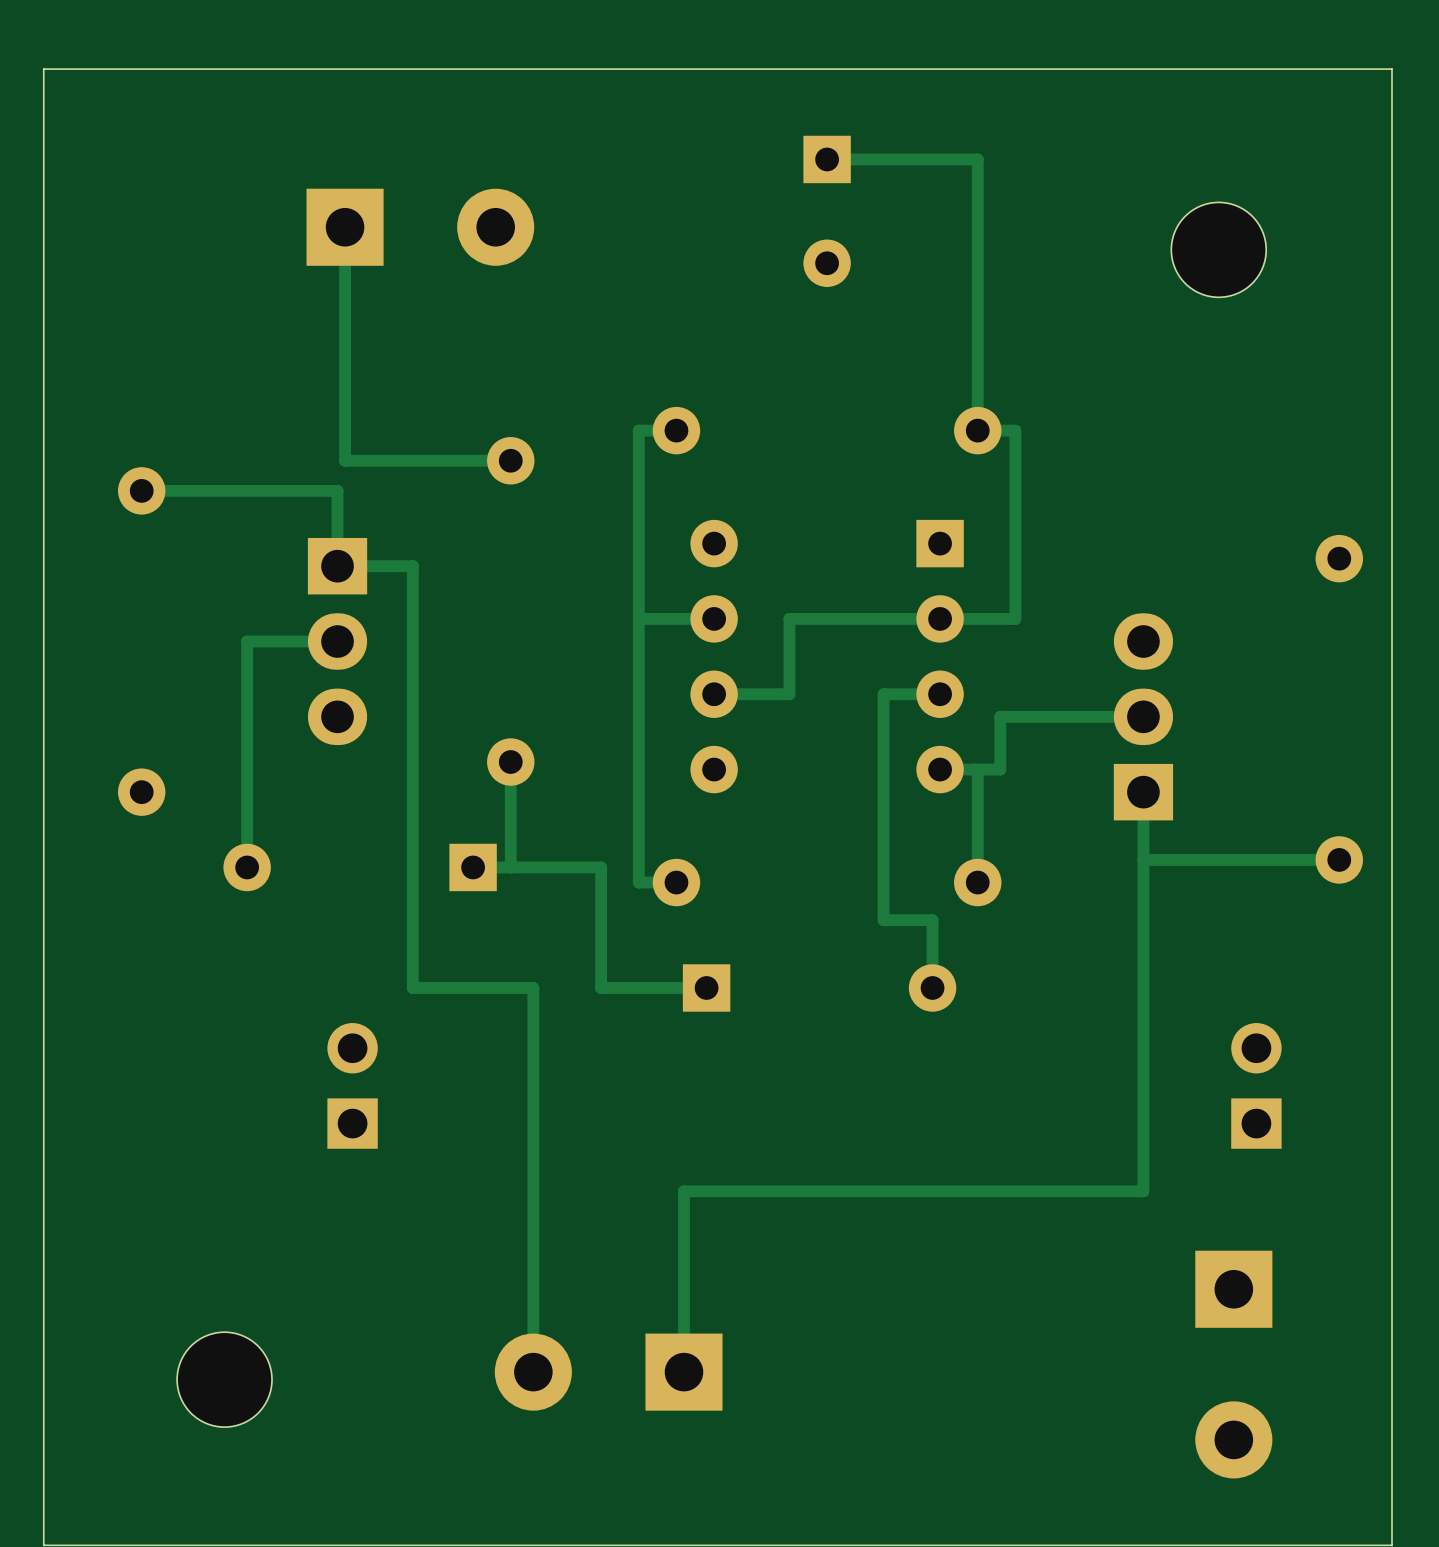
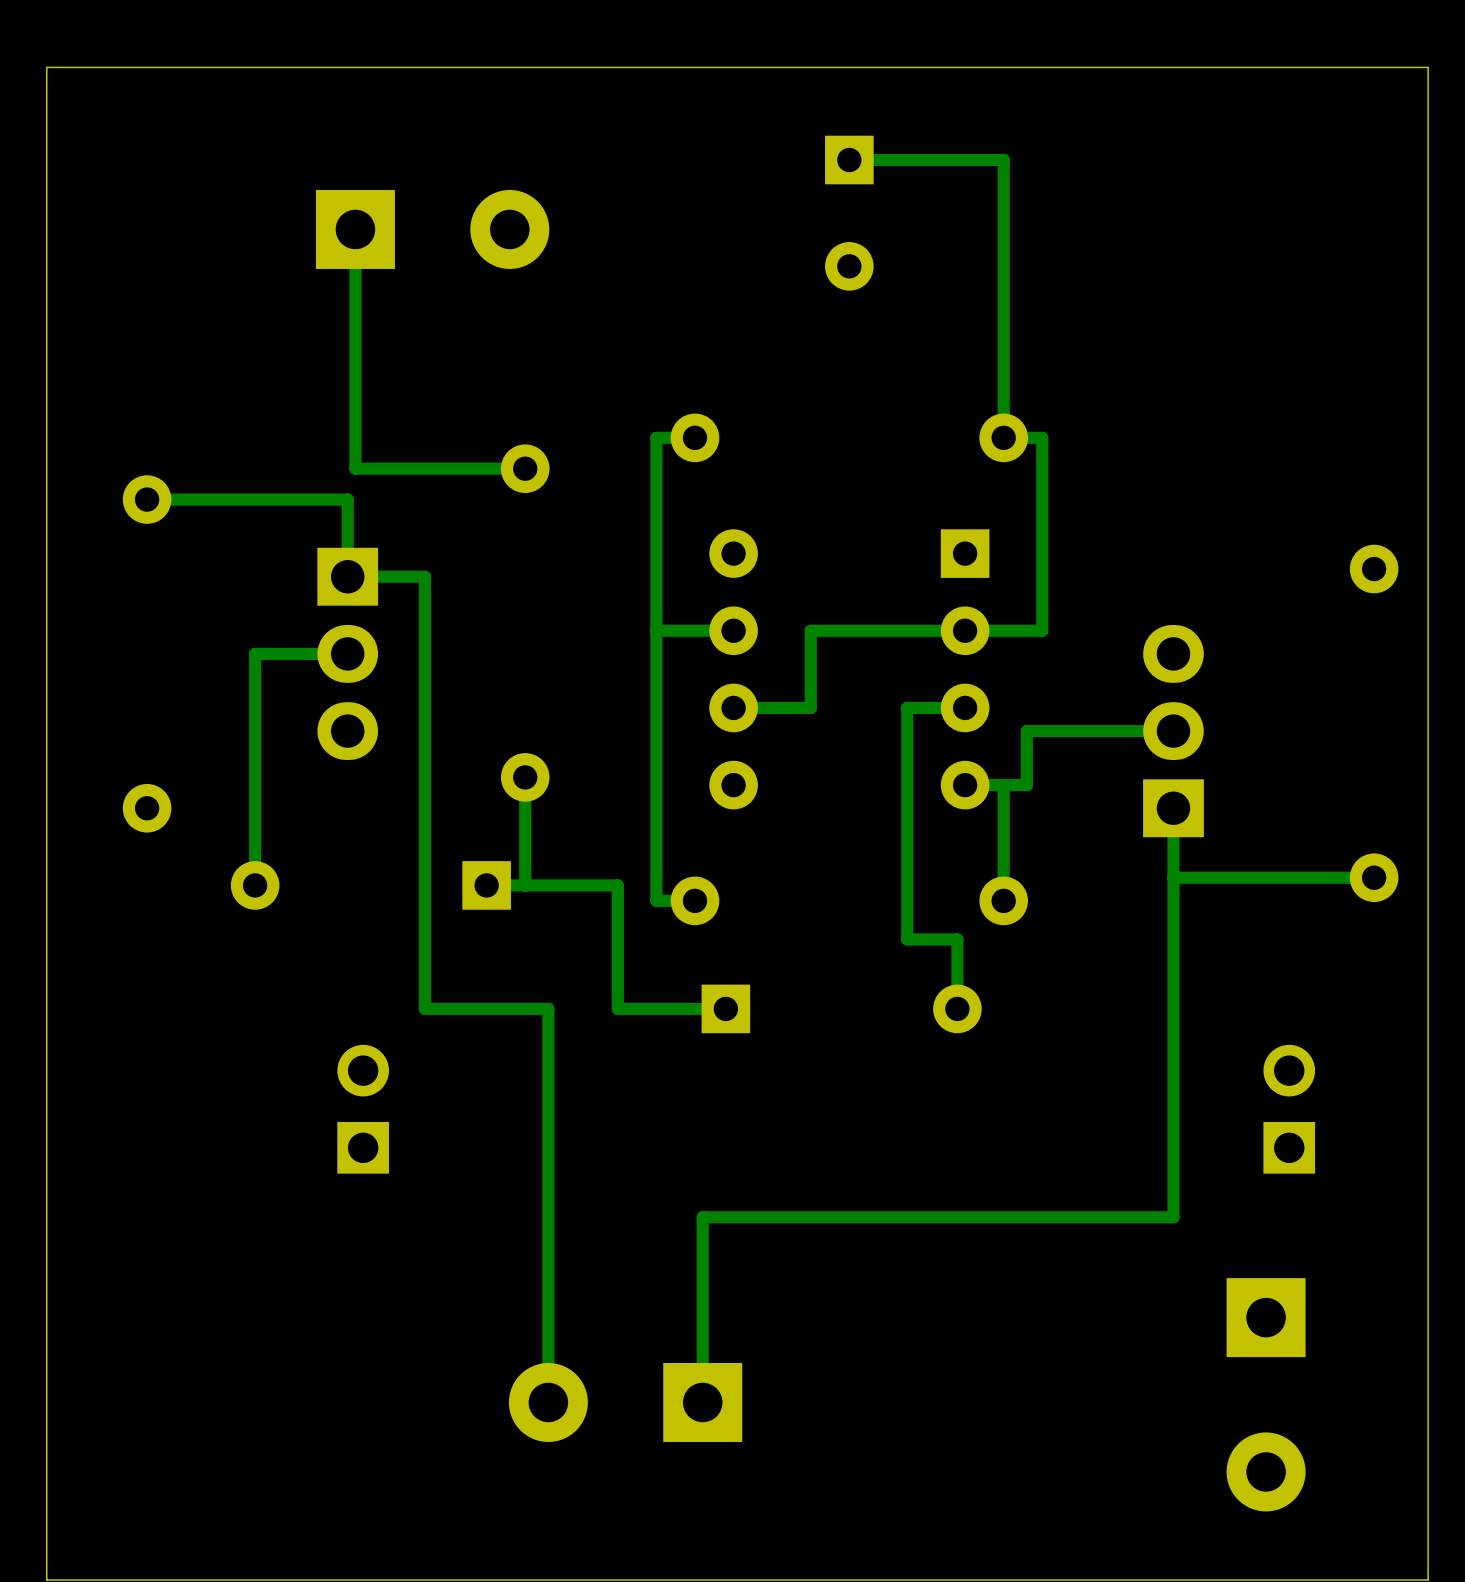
part: (1218, 249) -> none
part: (224, 1379) -> none

